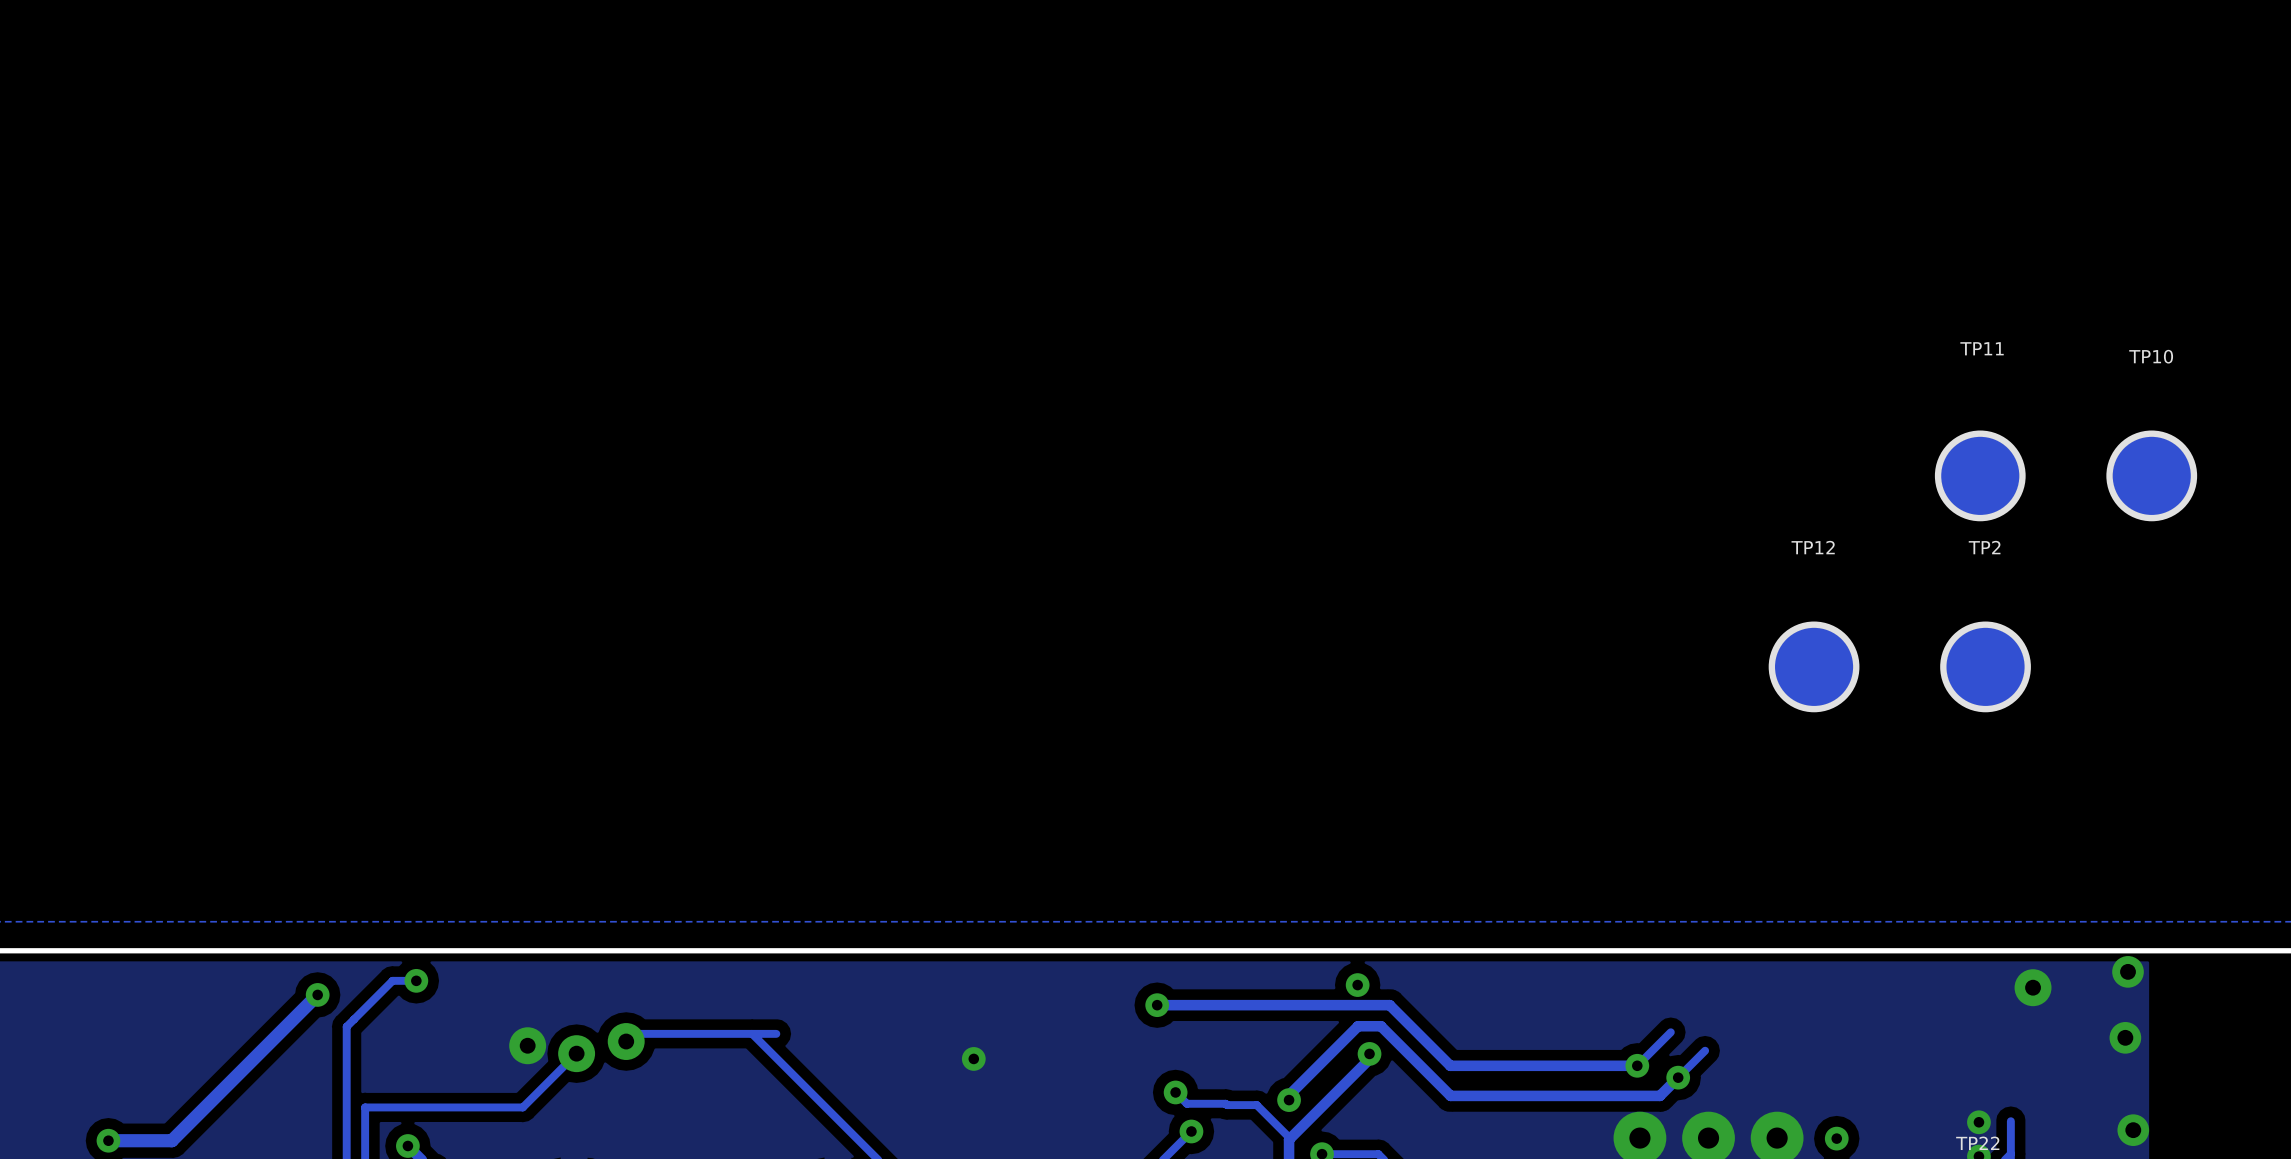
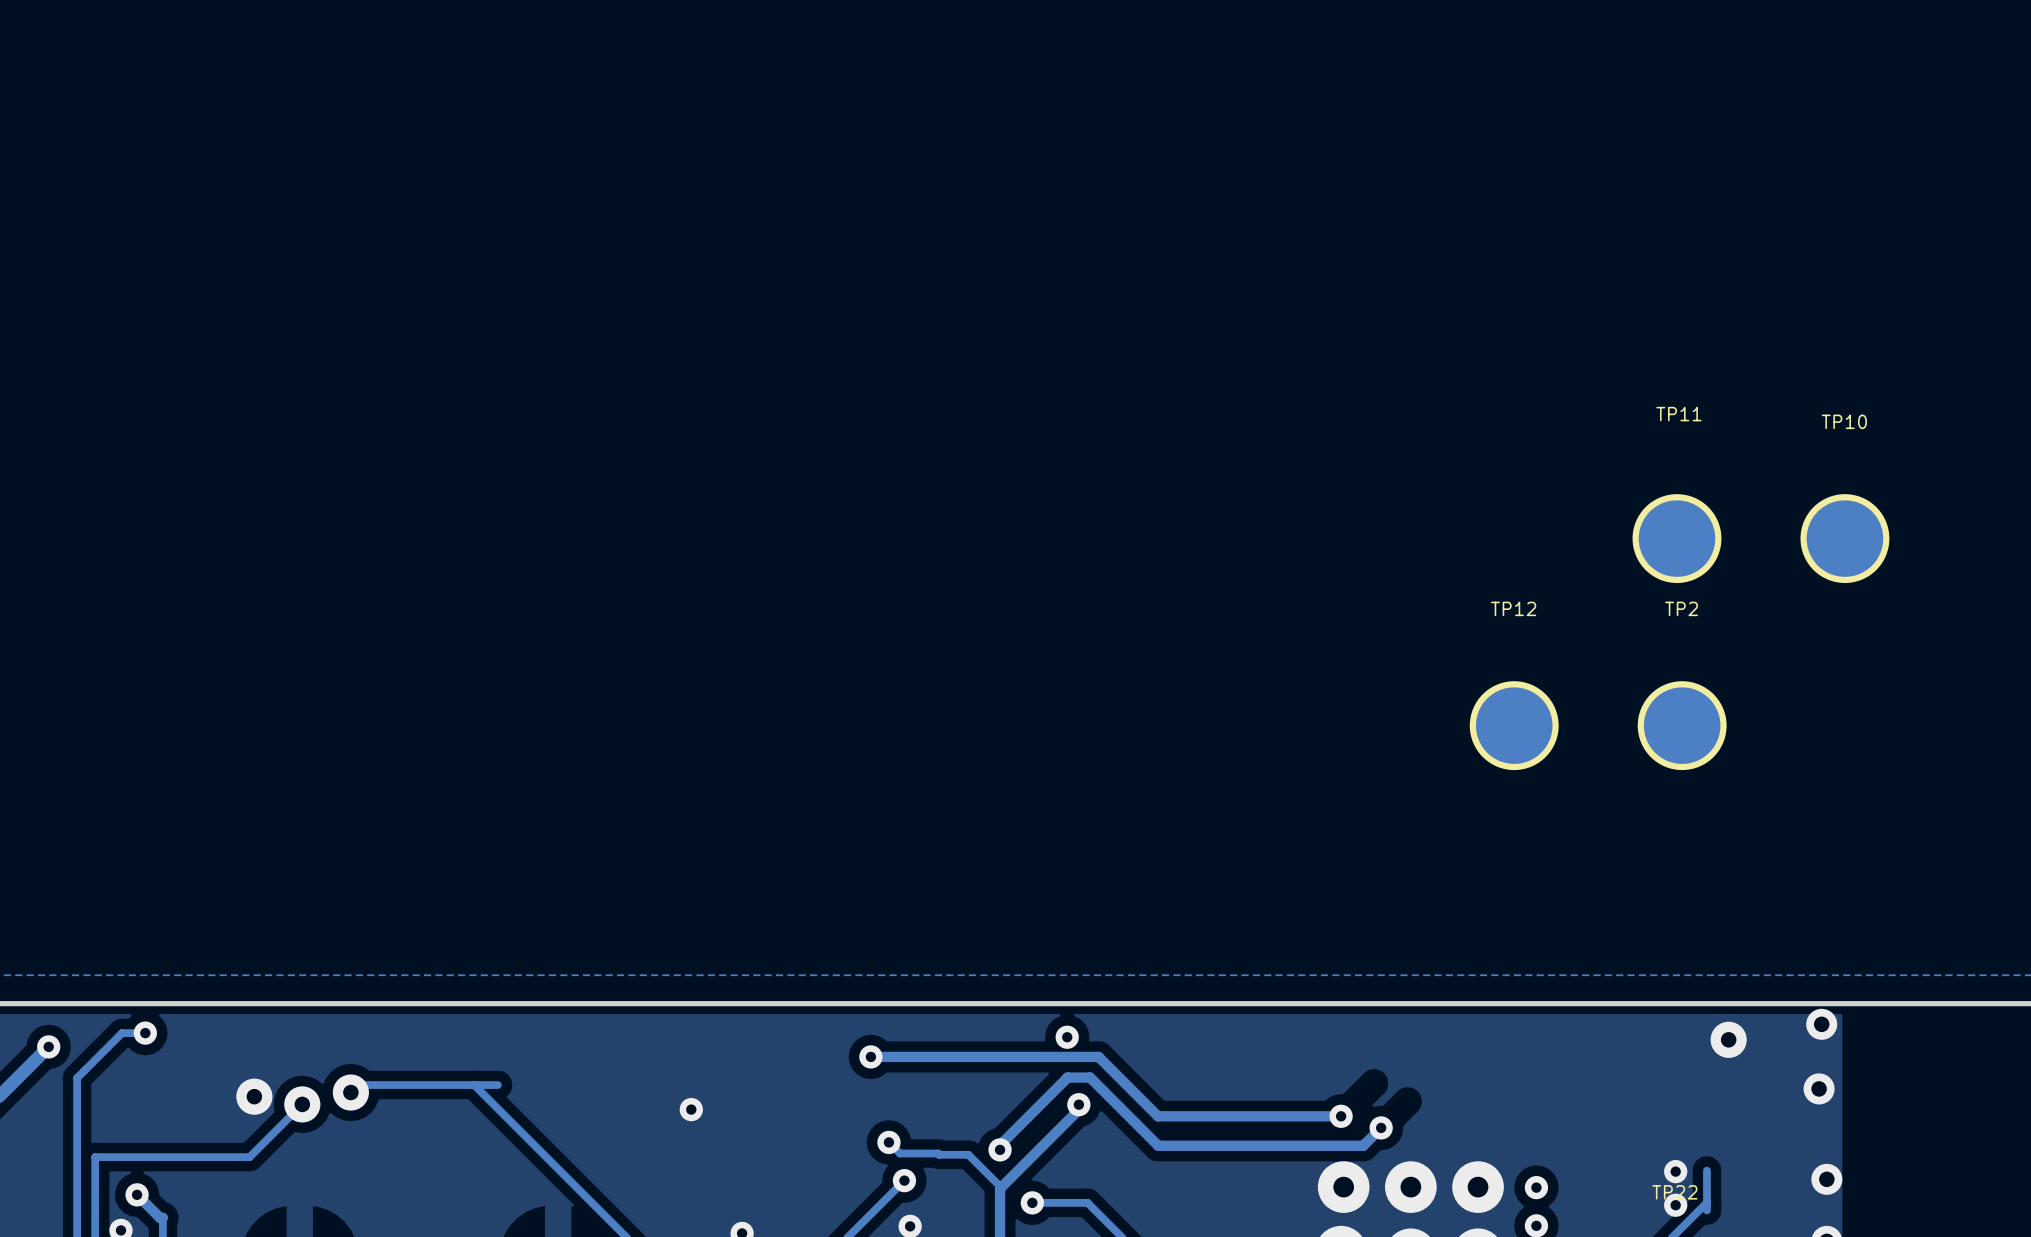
track: (1670, 1032) (1637, 1065) -> none
track: (1705, 1050) (1678, 1077) -> none

